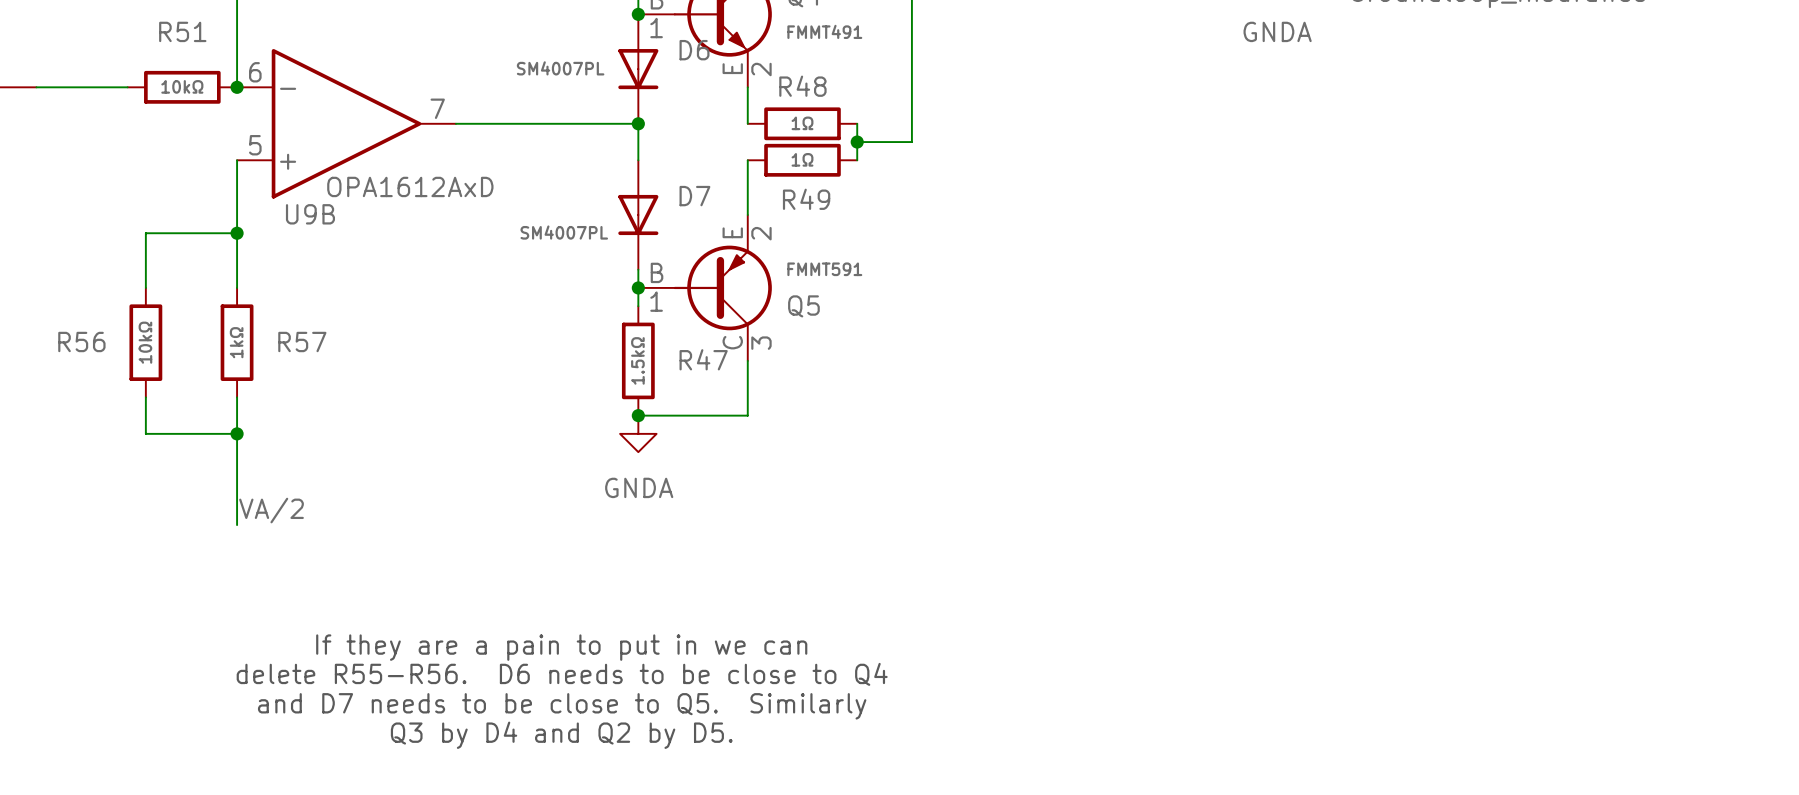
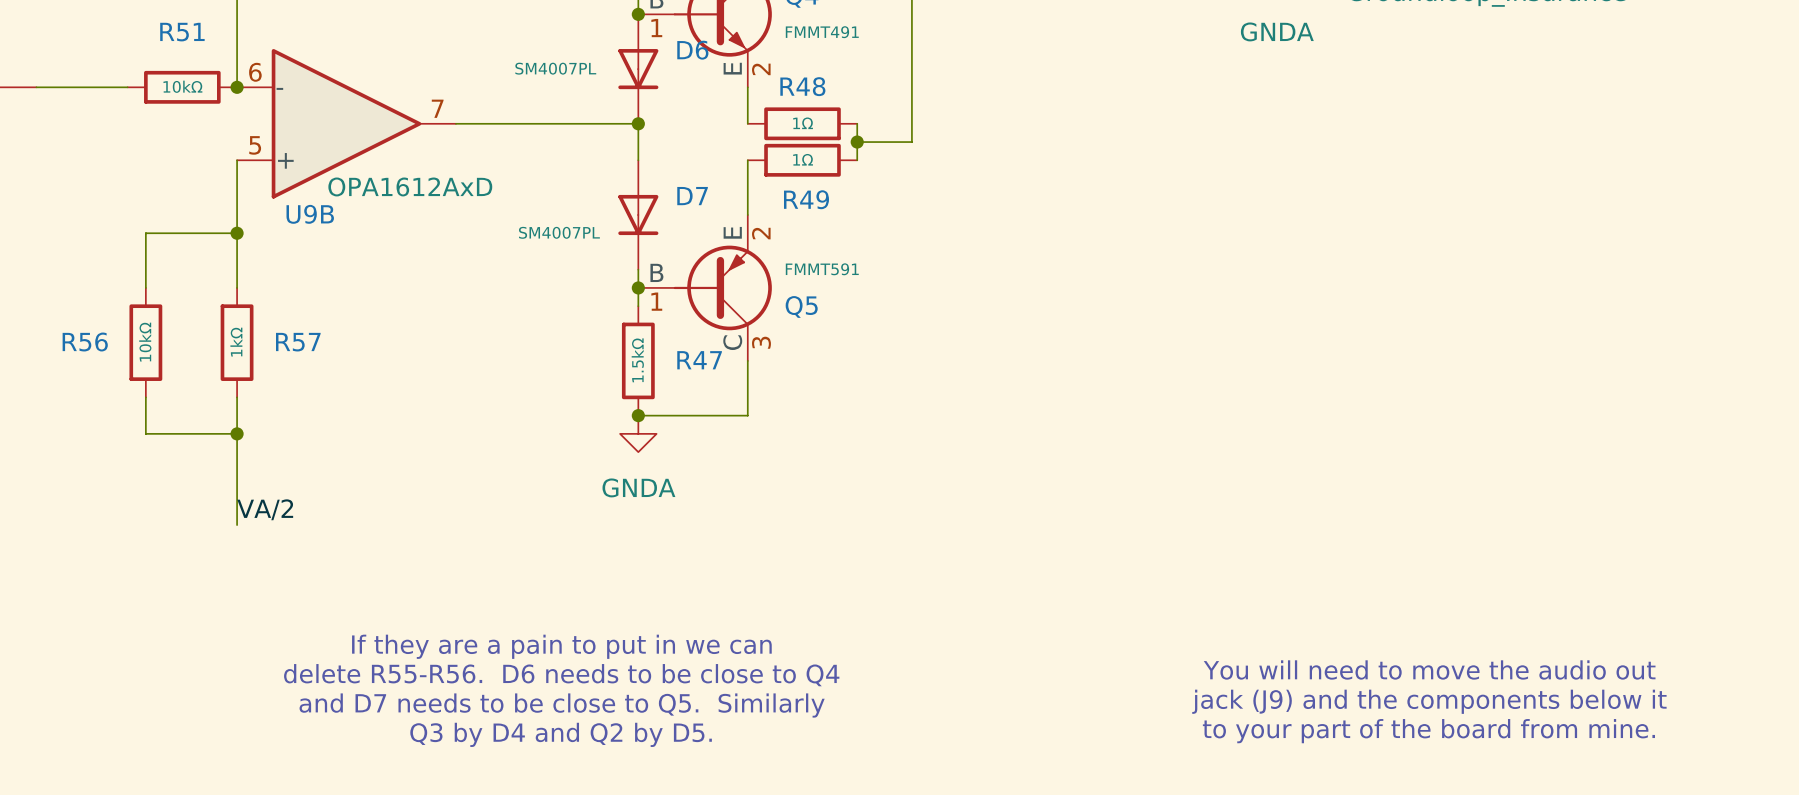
text: none -> You will need to move the audio out (1429, 669)
text: none -> jack (J9) and the components below it (1429, 701)
text: none -> to your part of the board from mine. (1428, 731)

